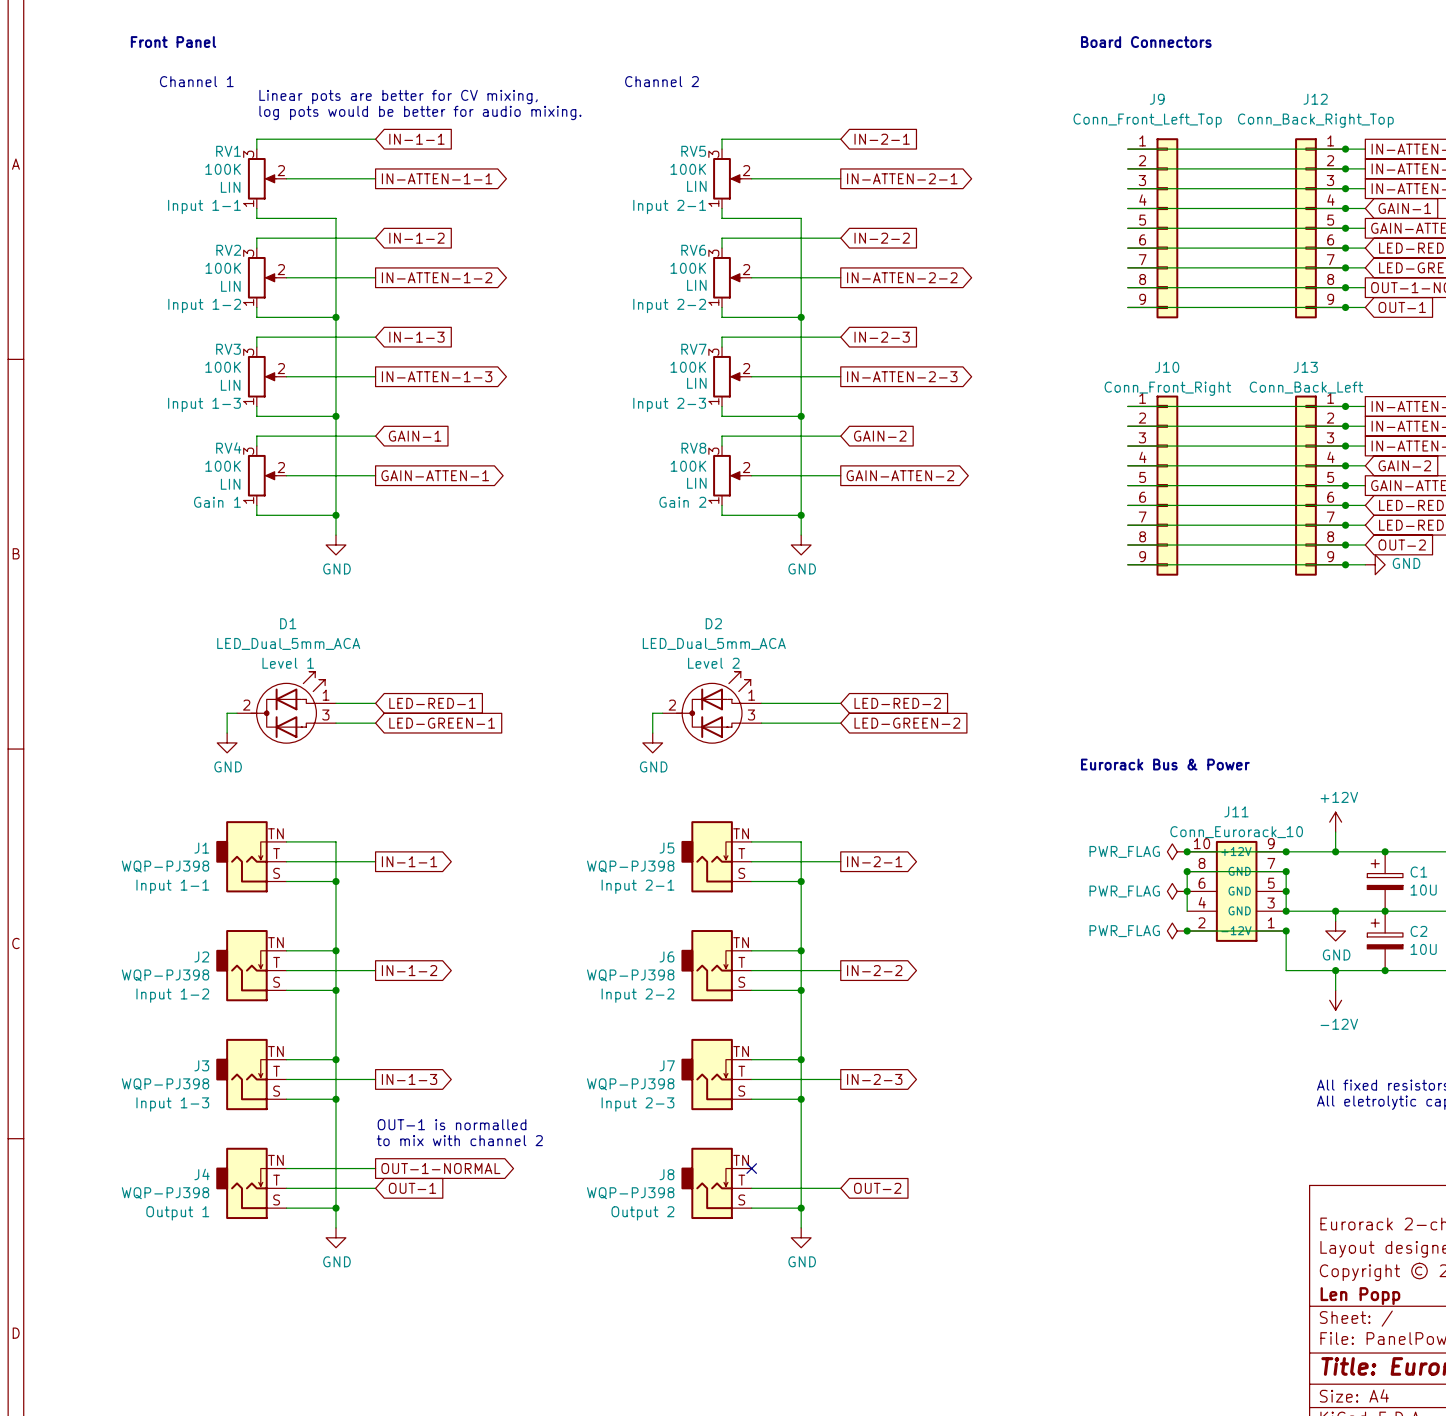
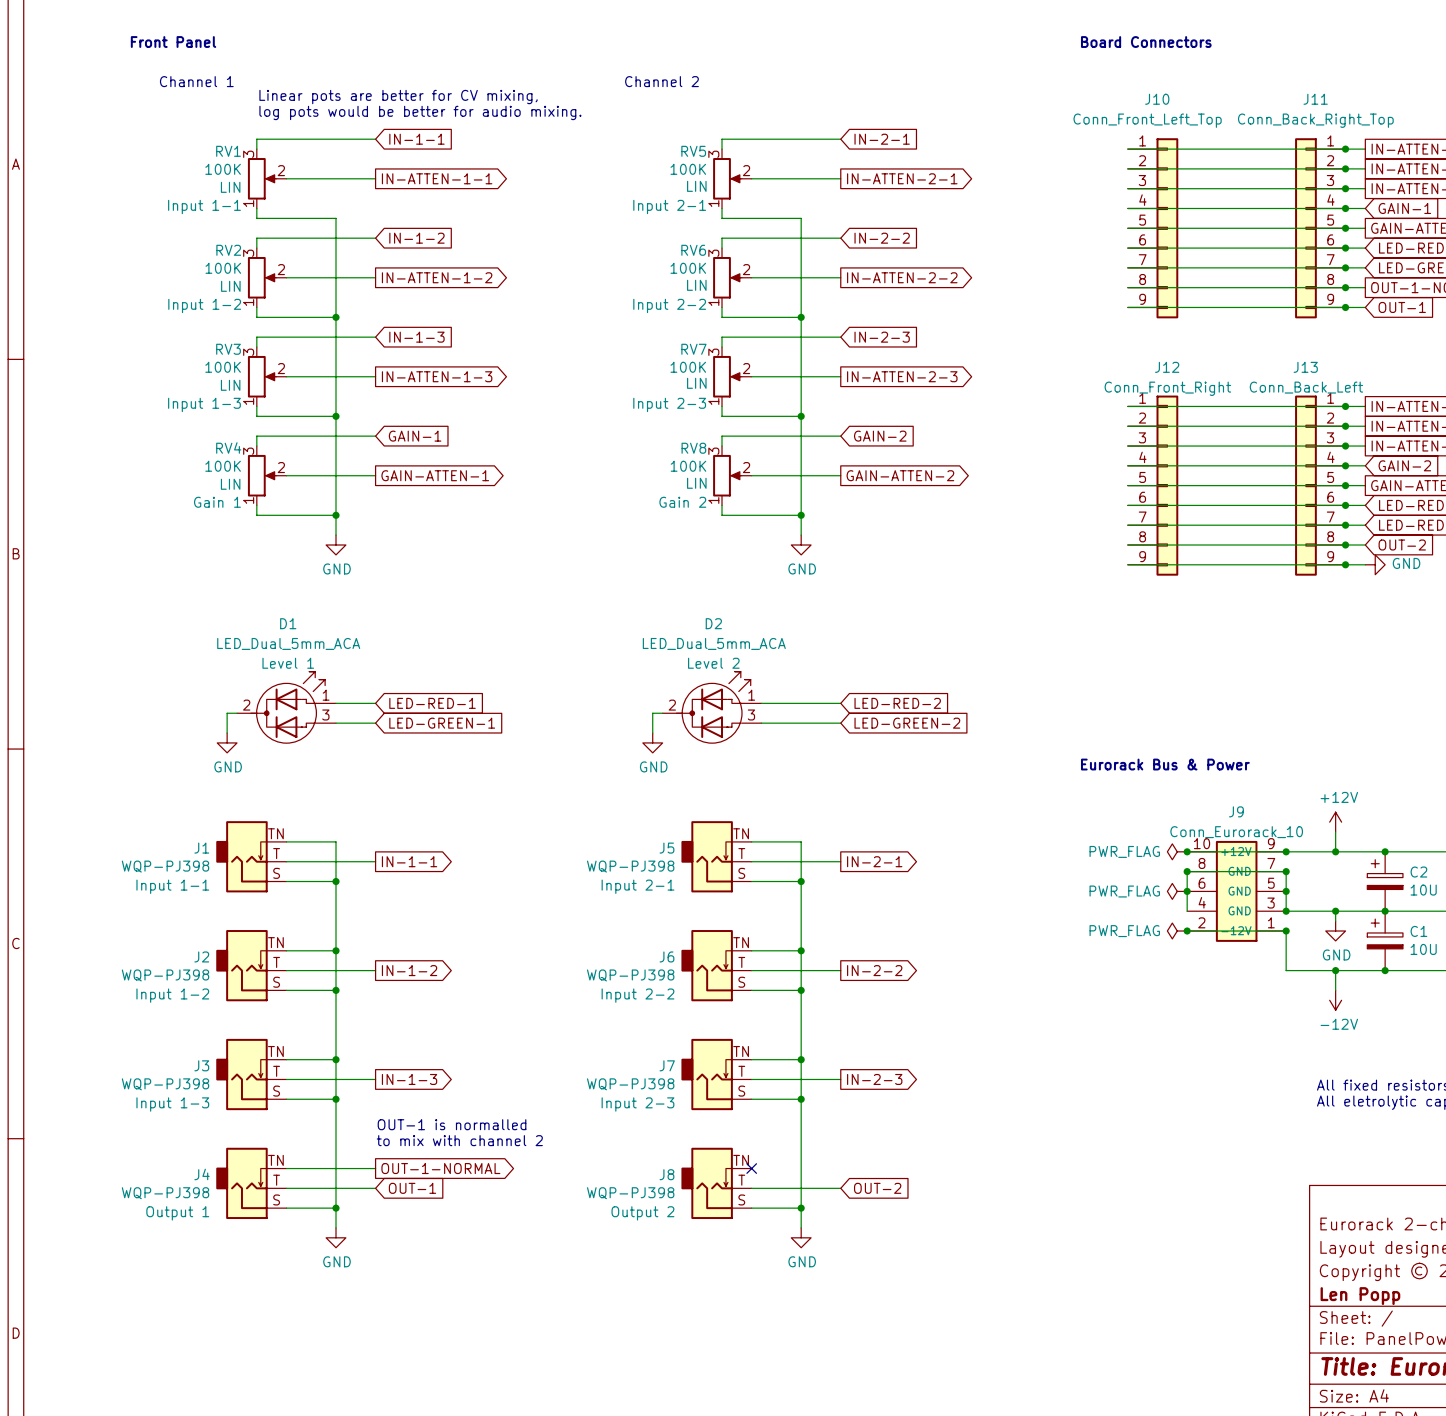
J9 name: J9 (1157, 99) -> J10 (1157, 99)
J12 name: J12 (1315, 99) -> J11 (1315, 99)
J10 name: J10 (1167, 367) -> J12 (1167, 367)
J11 name: J11 (1236, 811) -> J9 (1236, 811)
C1 name: C1 (1418, 872) -> C2 (1418, 872)
C2 name: C2 (1418, 931) -> C1 (1418, 931)

